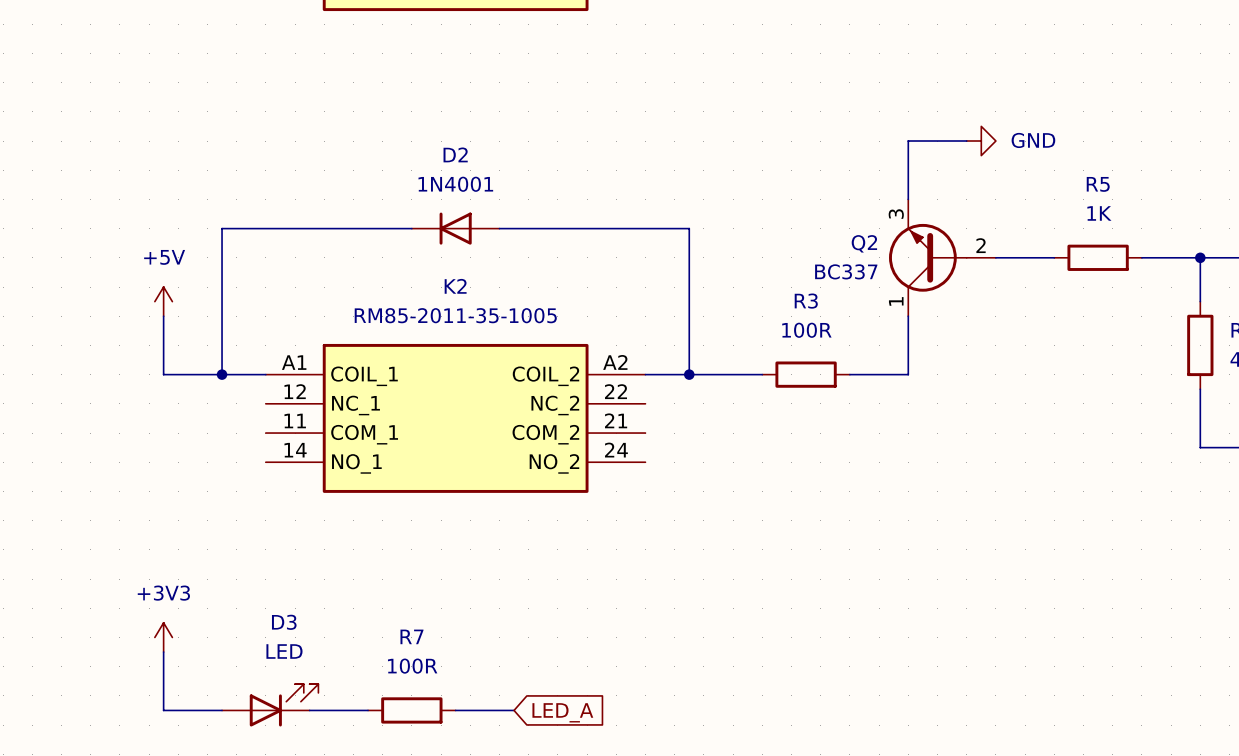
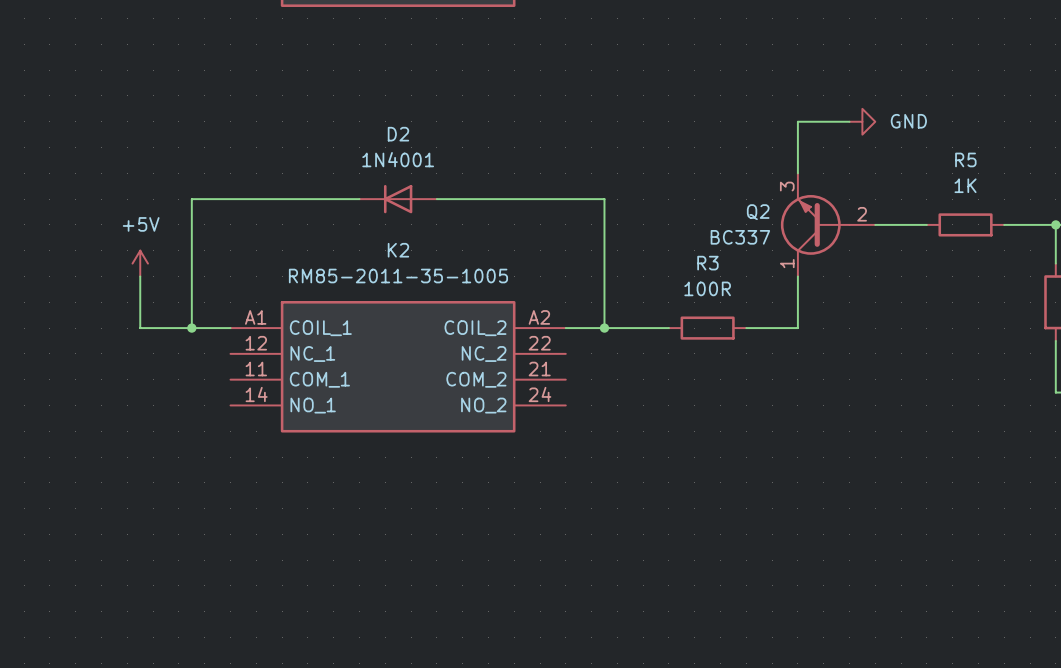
power symbol: +3V3 (163, 637) -> none
wire: (163, 652) (163, 710) (222, 710) -> none
D3: LED (270, 705) -> none
wire: (309, 710) (368, 710) -> none
R7: 100R (411, 710) -> none
wire: (455, 710) (514, 710) -> none
global label: LED_A (562, 712) -> none

